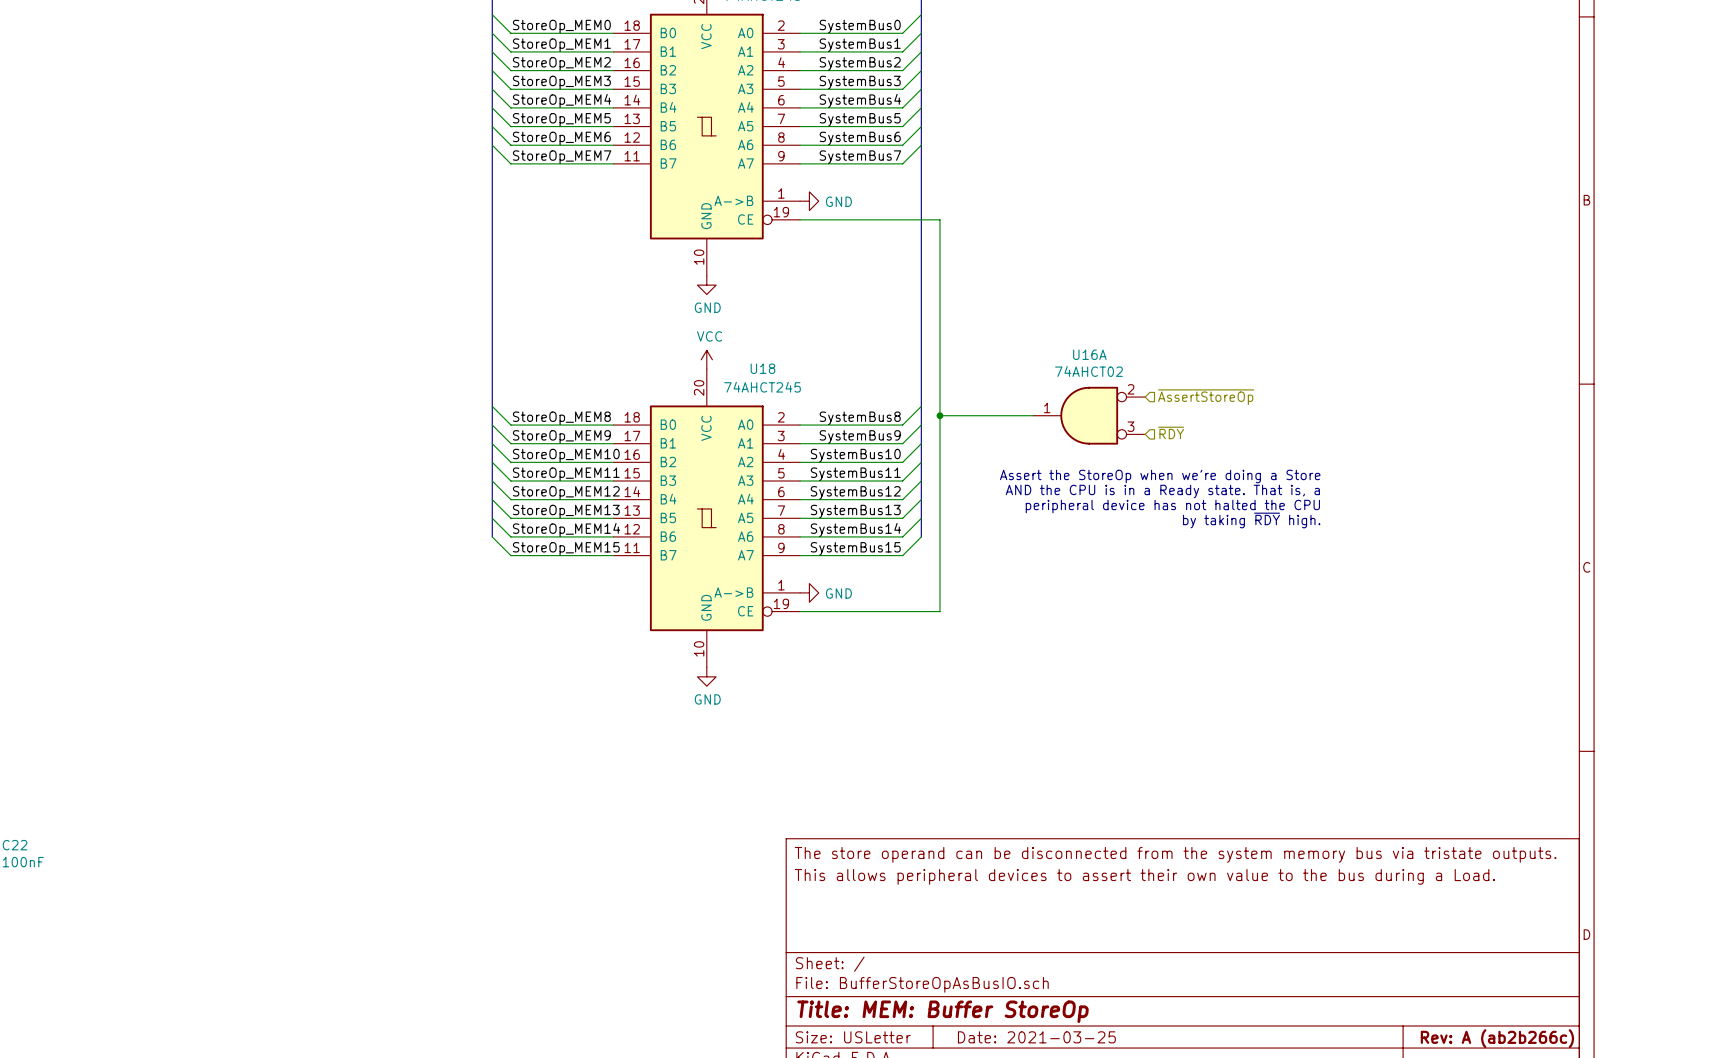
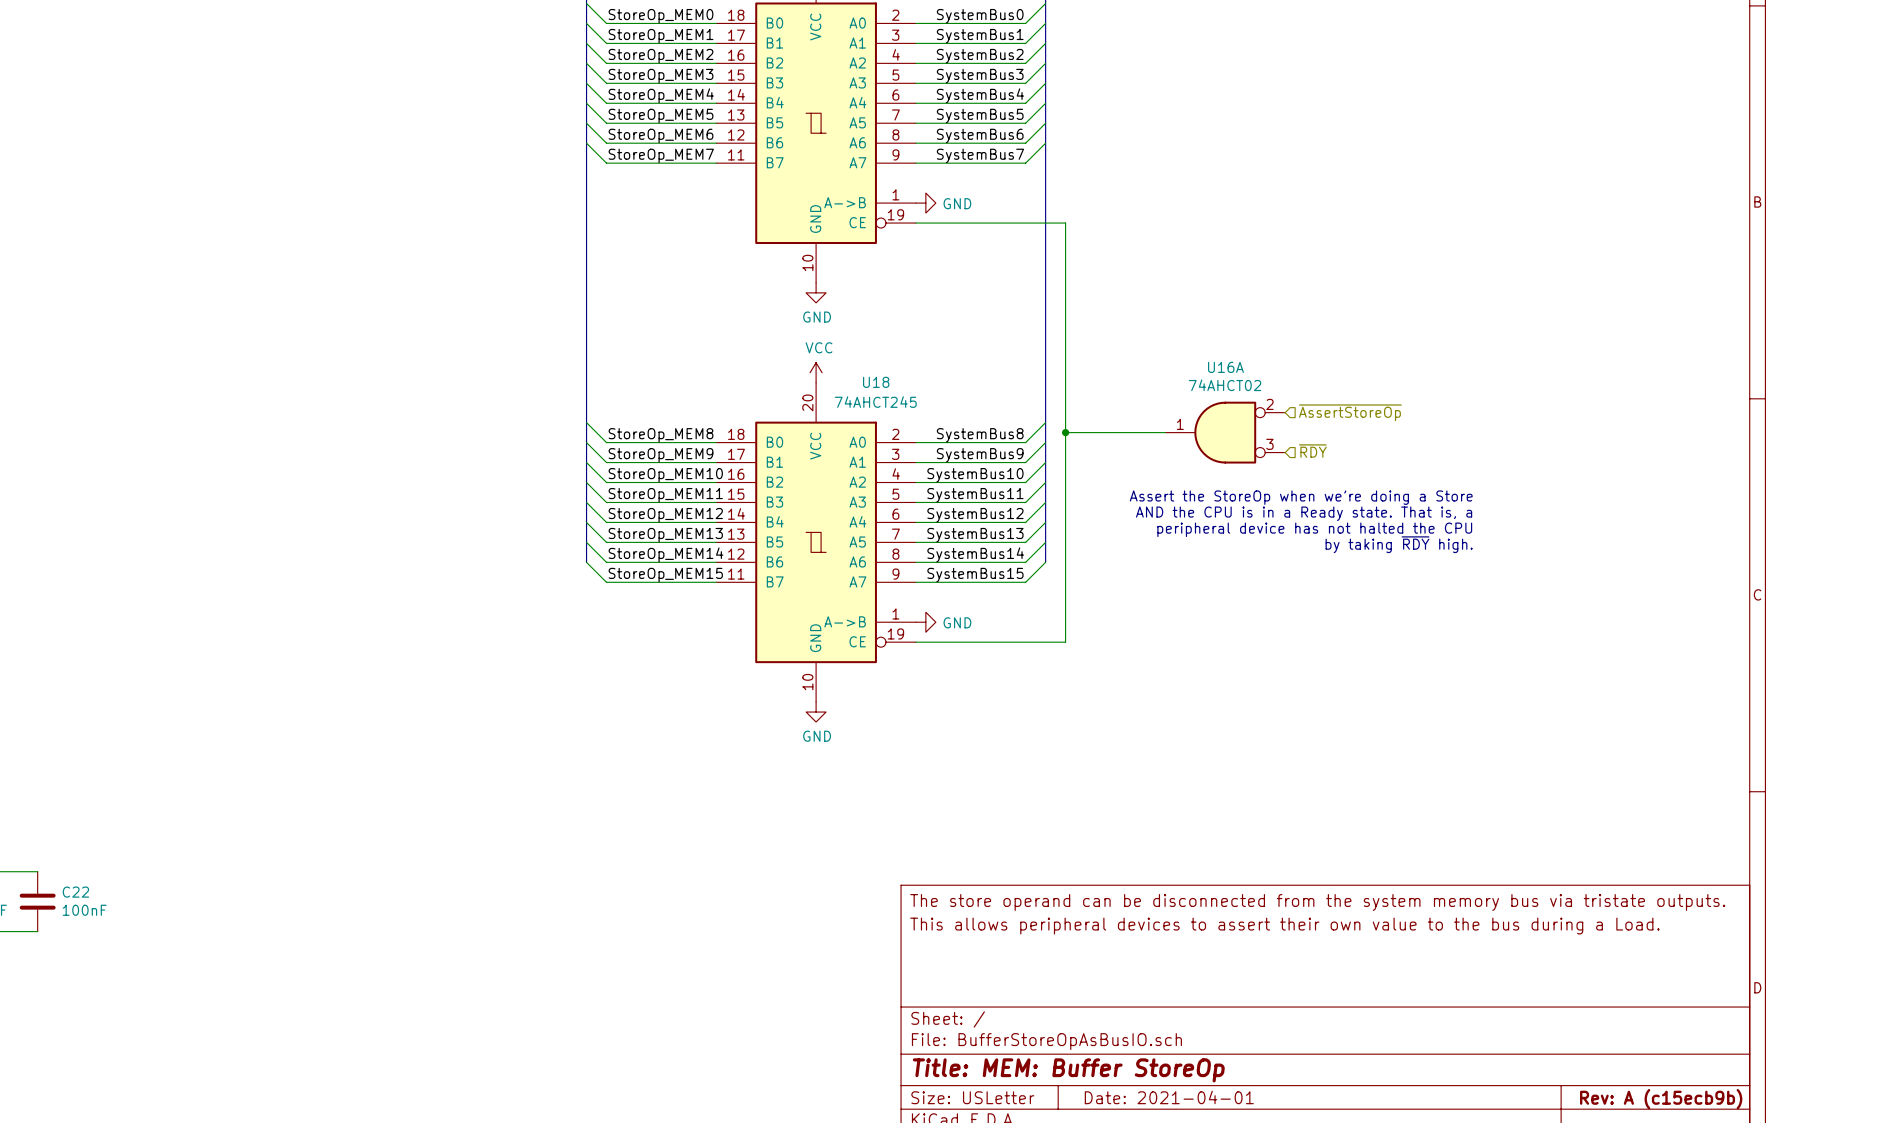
title block: Date: 2021-03-25 (1036, 1037) -> Date: 2021-04-01 (1169, 1097)
title block: Rev: A (ab2b266c) (1497, 1038) -> Rev: A (c15ecb9b) (1661, 1099)

